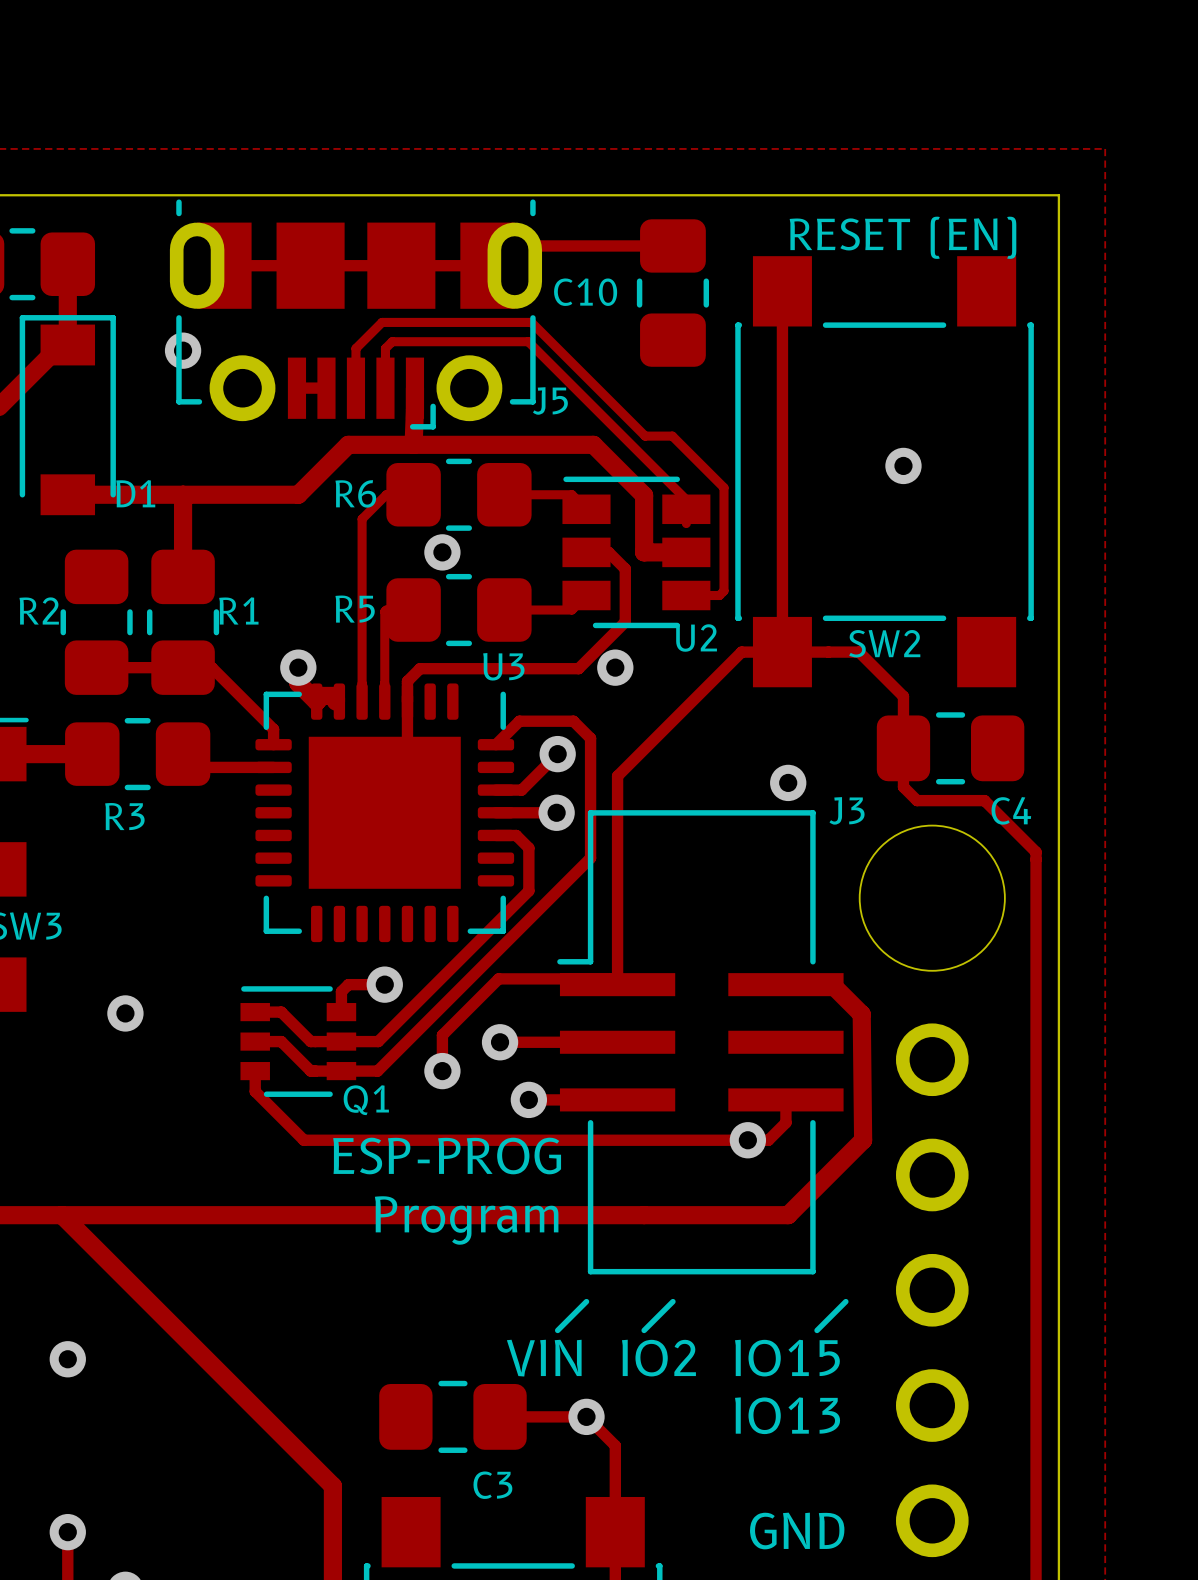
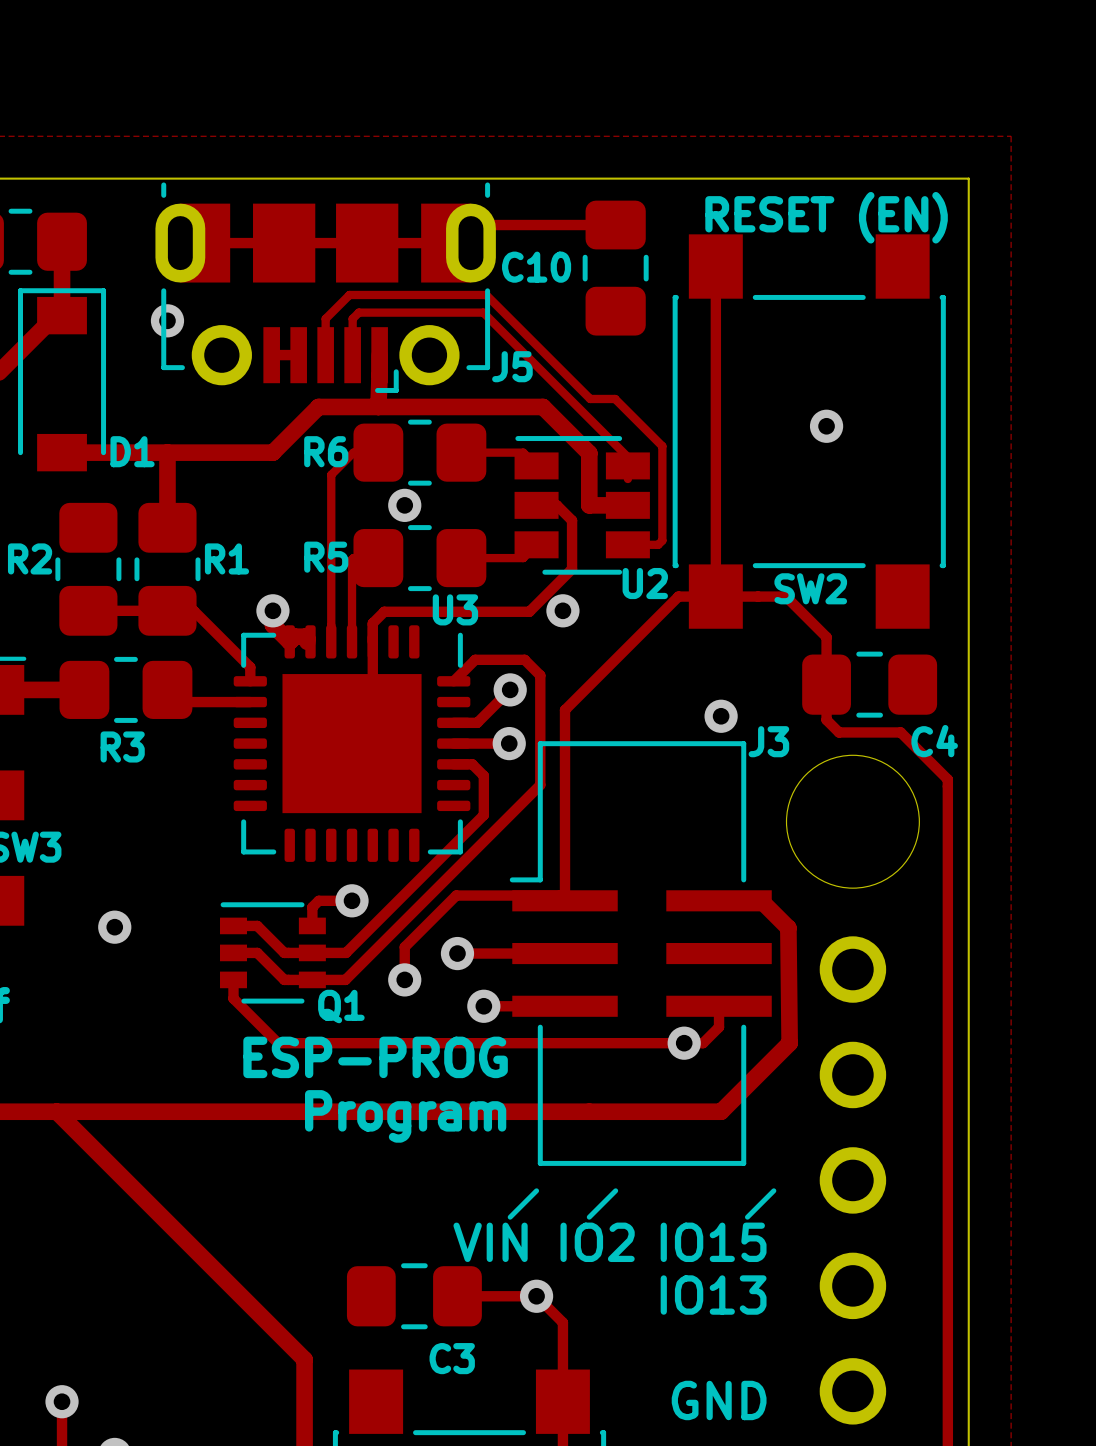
via: (67, 1359) -> none

